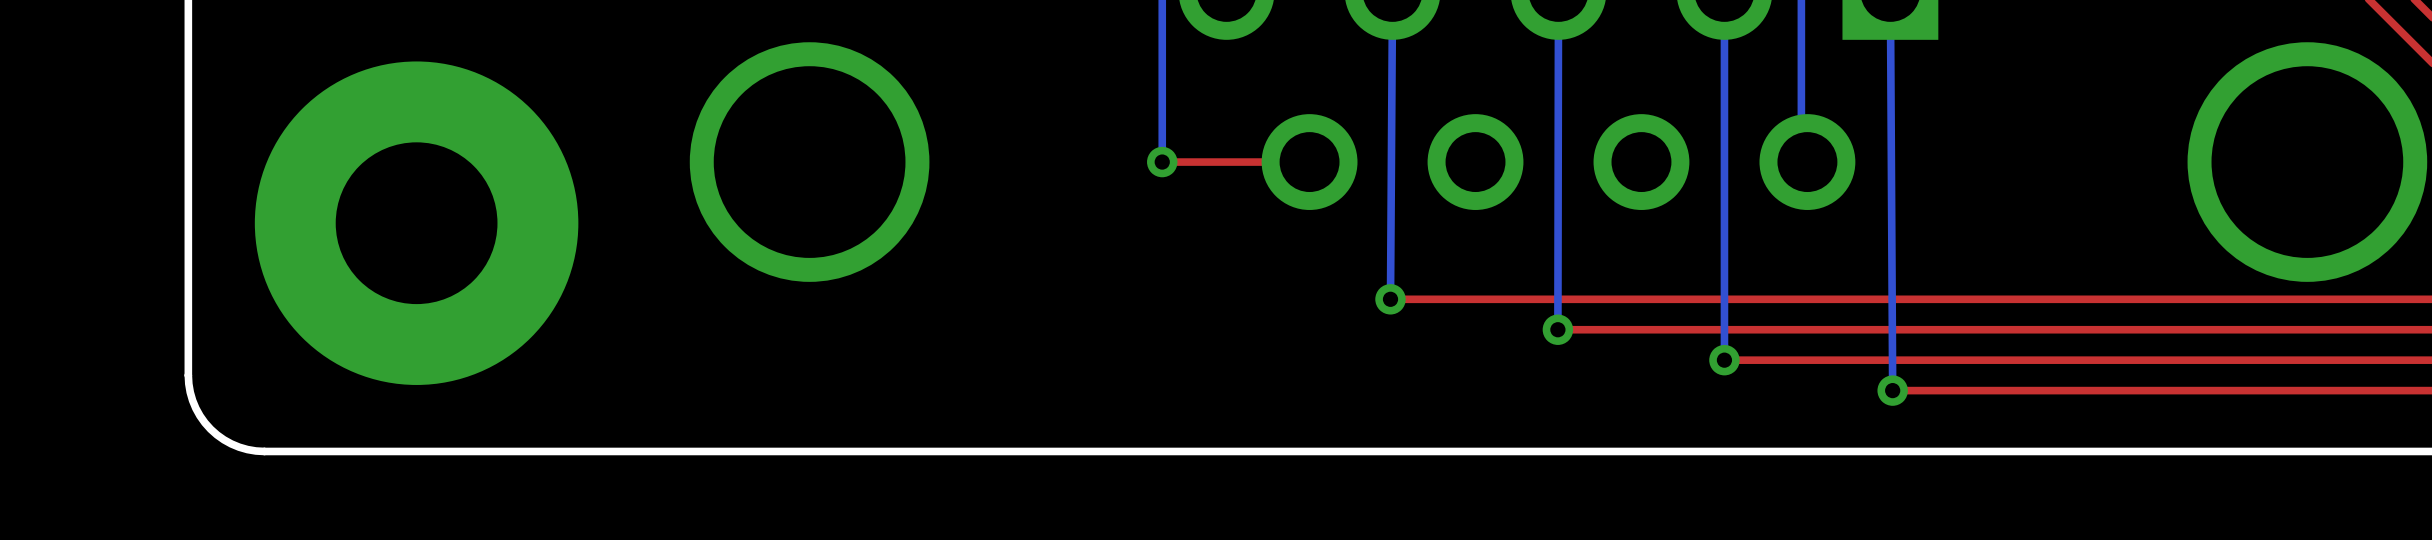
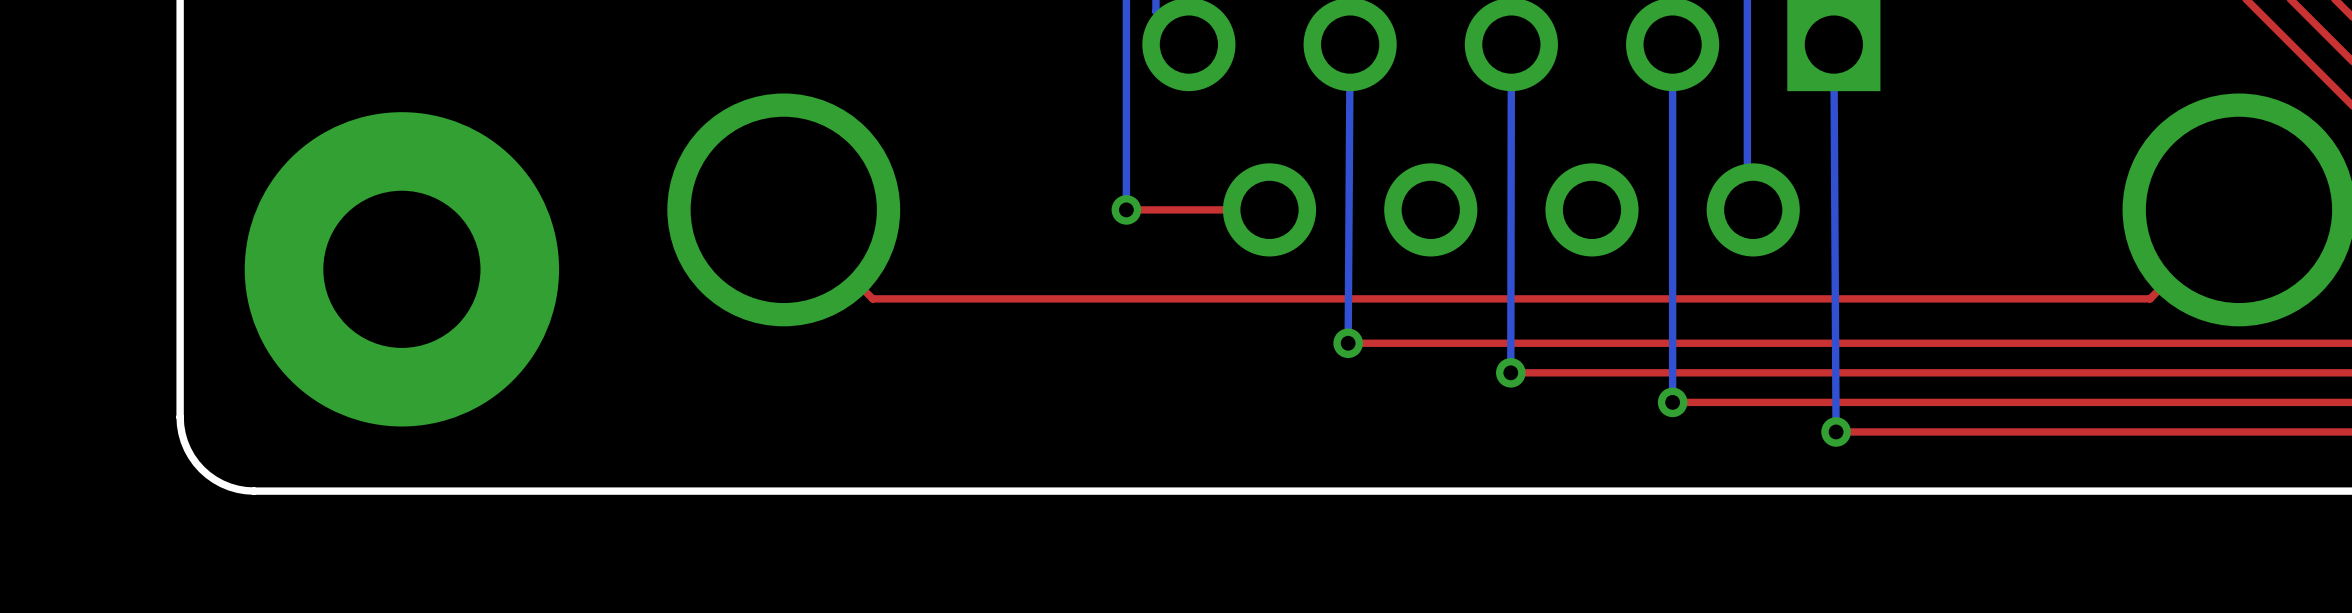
top track: none -> (2239, 209) (2150, 298) (872, 298) (783, 209)

